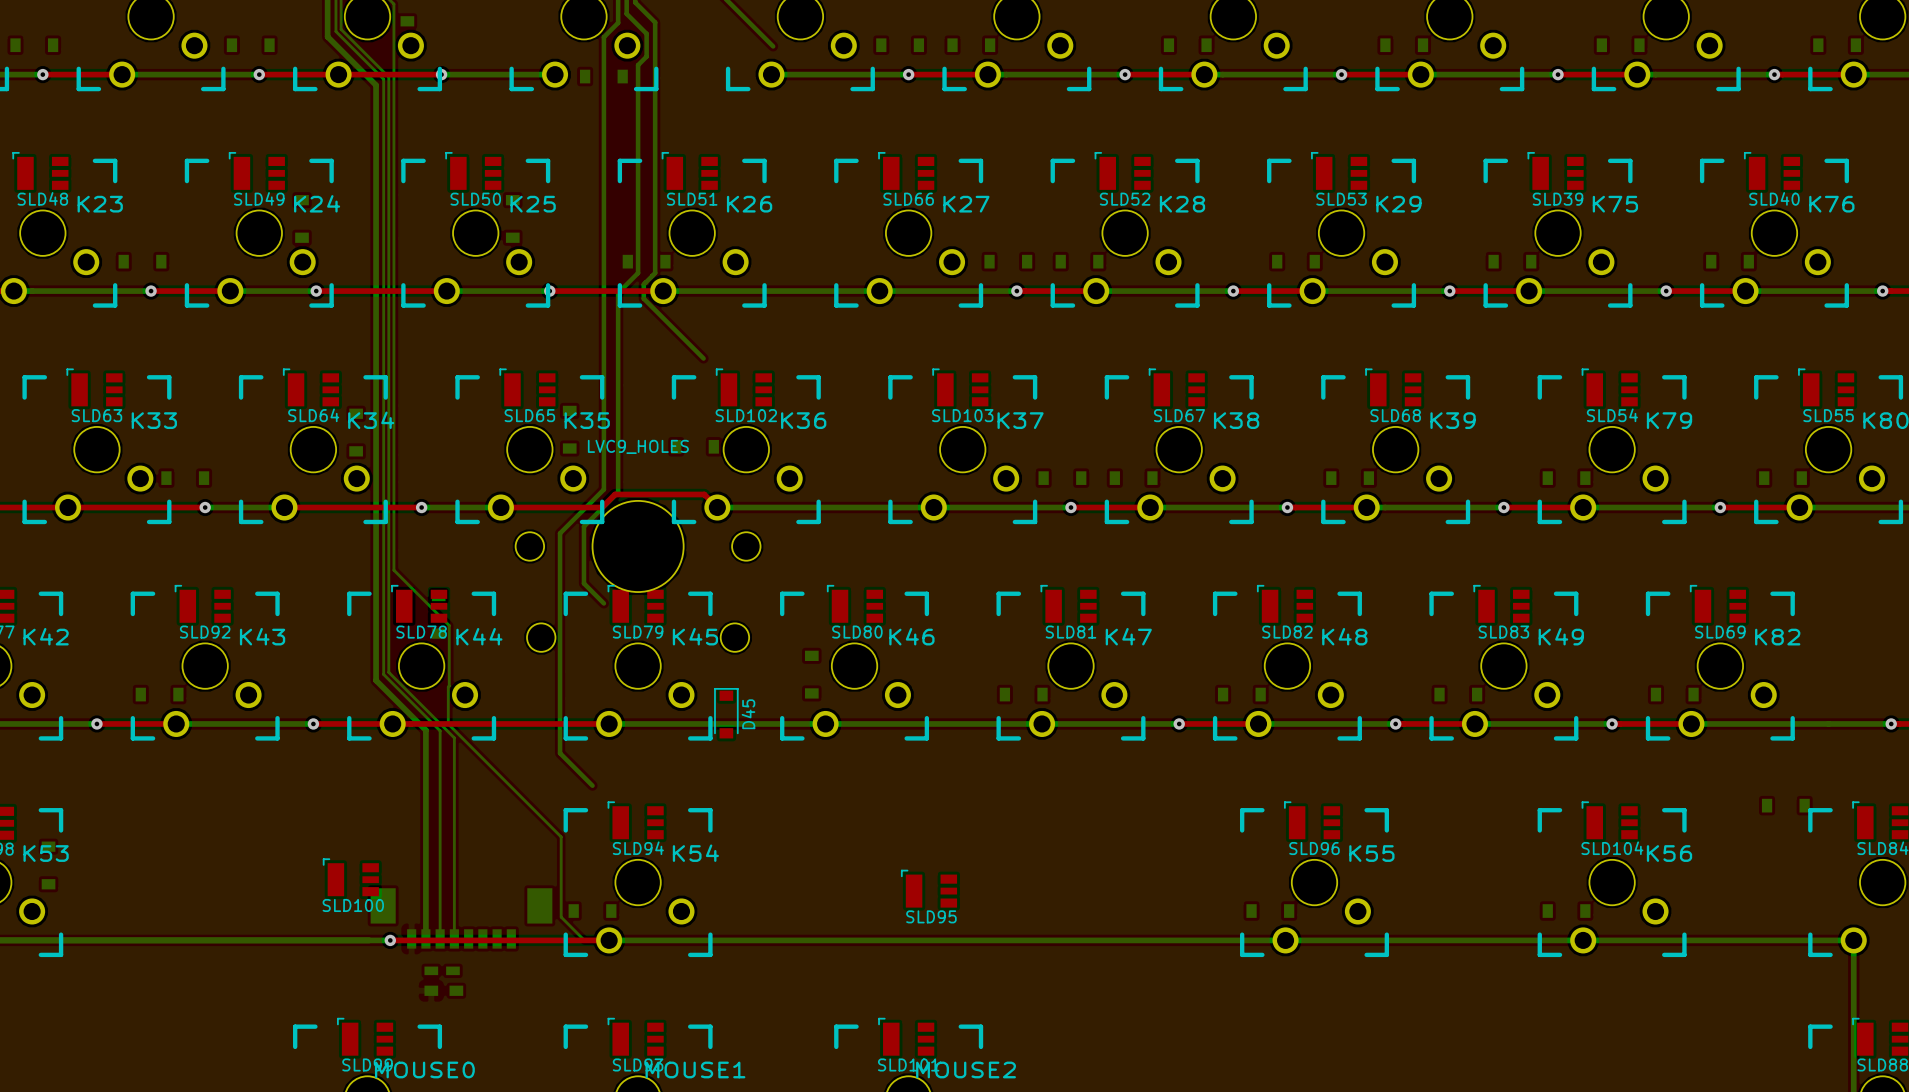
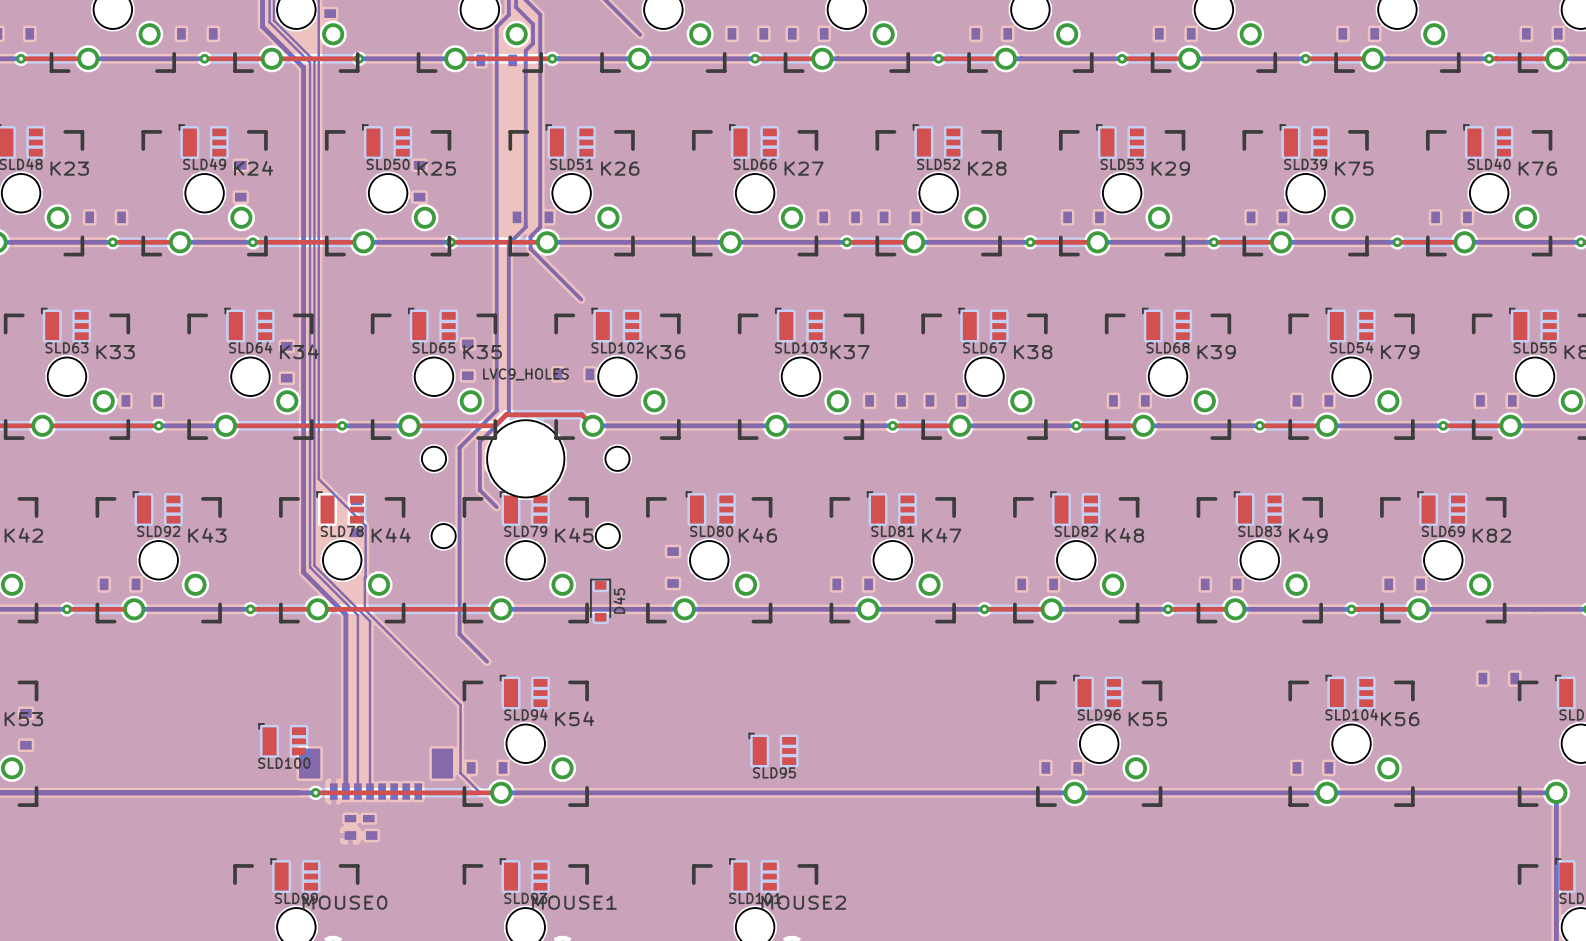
top track: none -> (455, 58) (552, 58)
bottom track: none -> (552, 58) (638, 58)
via: none -> (552, 58)

